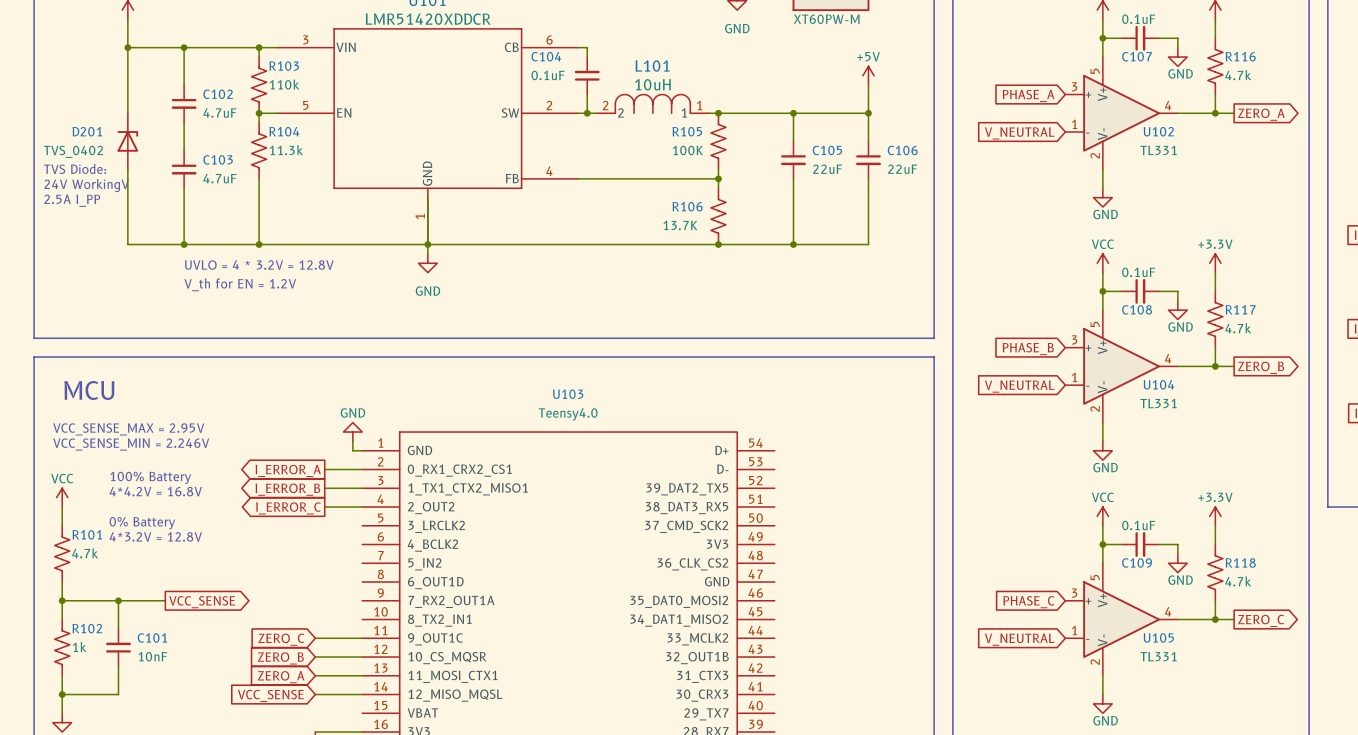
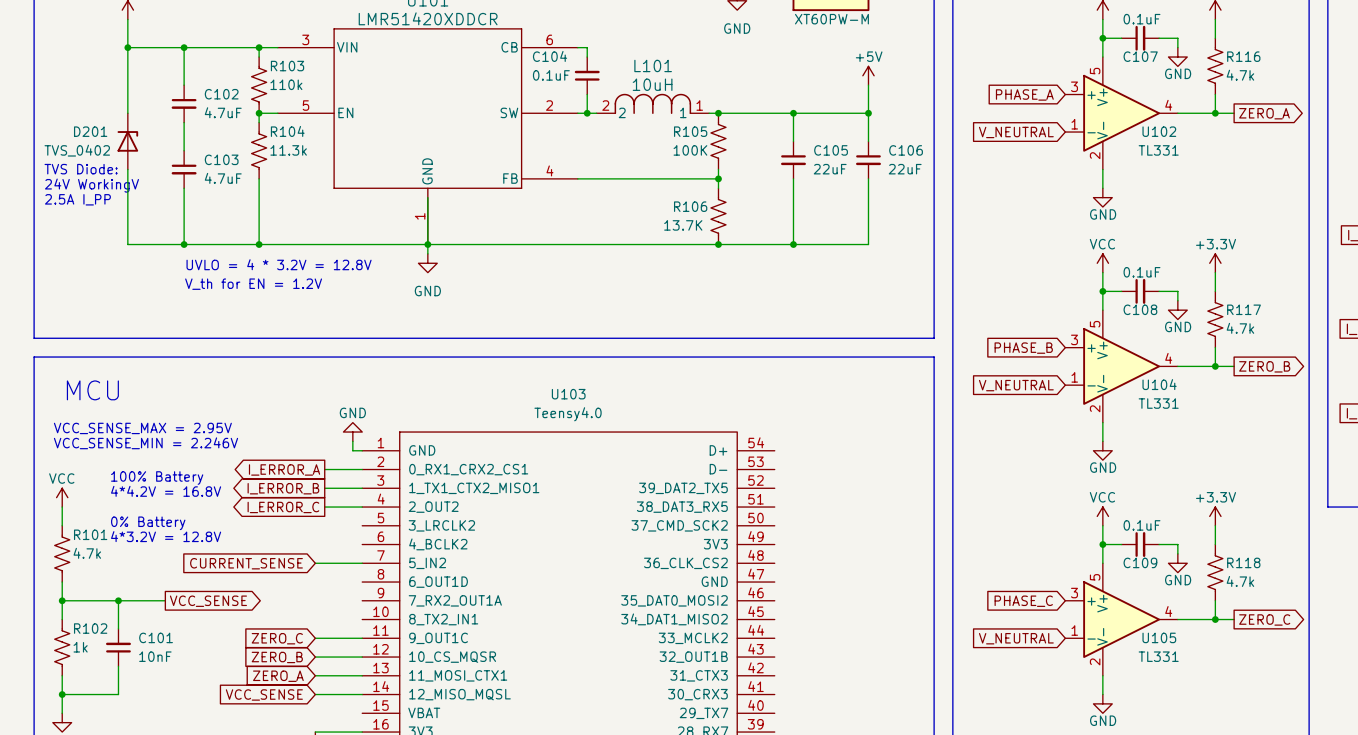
wire: none -> (315, 563) (362, 563)
global label: none -> CURRENT_SENSE (246, 563)

